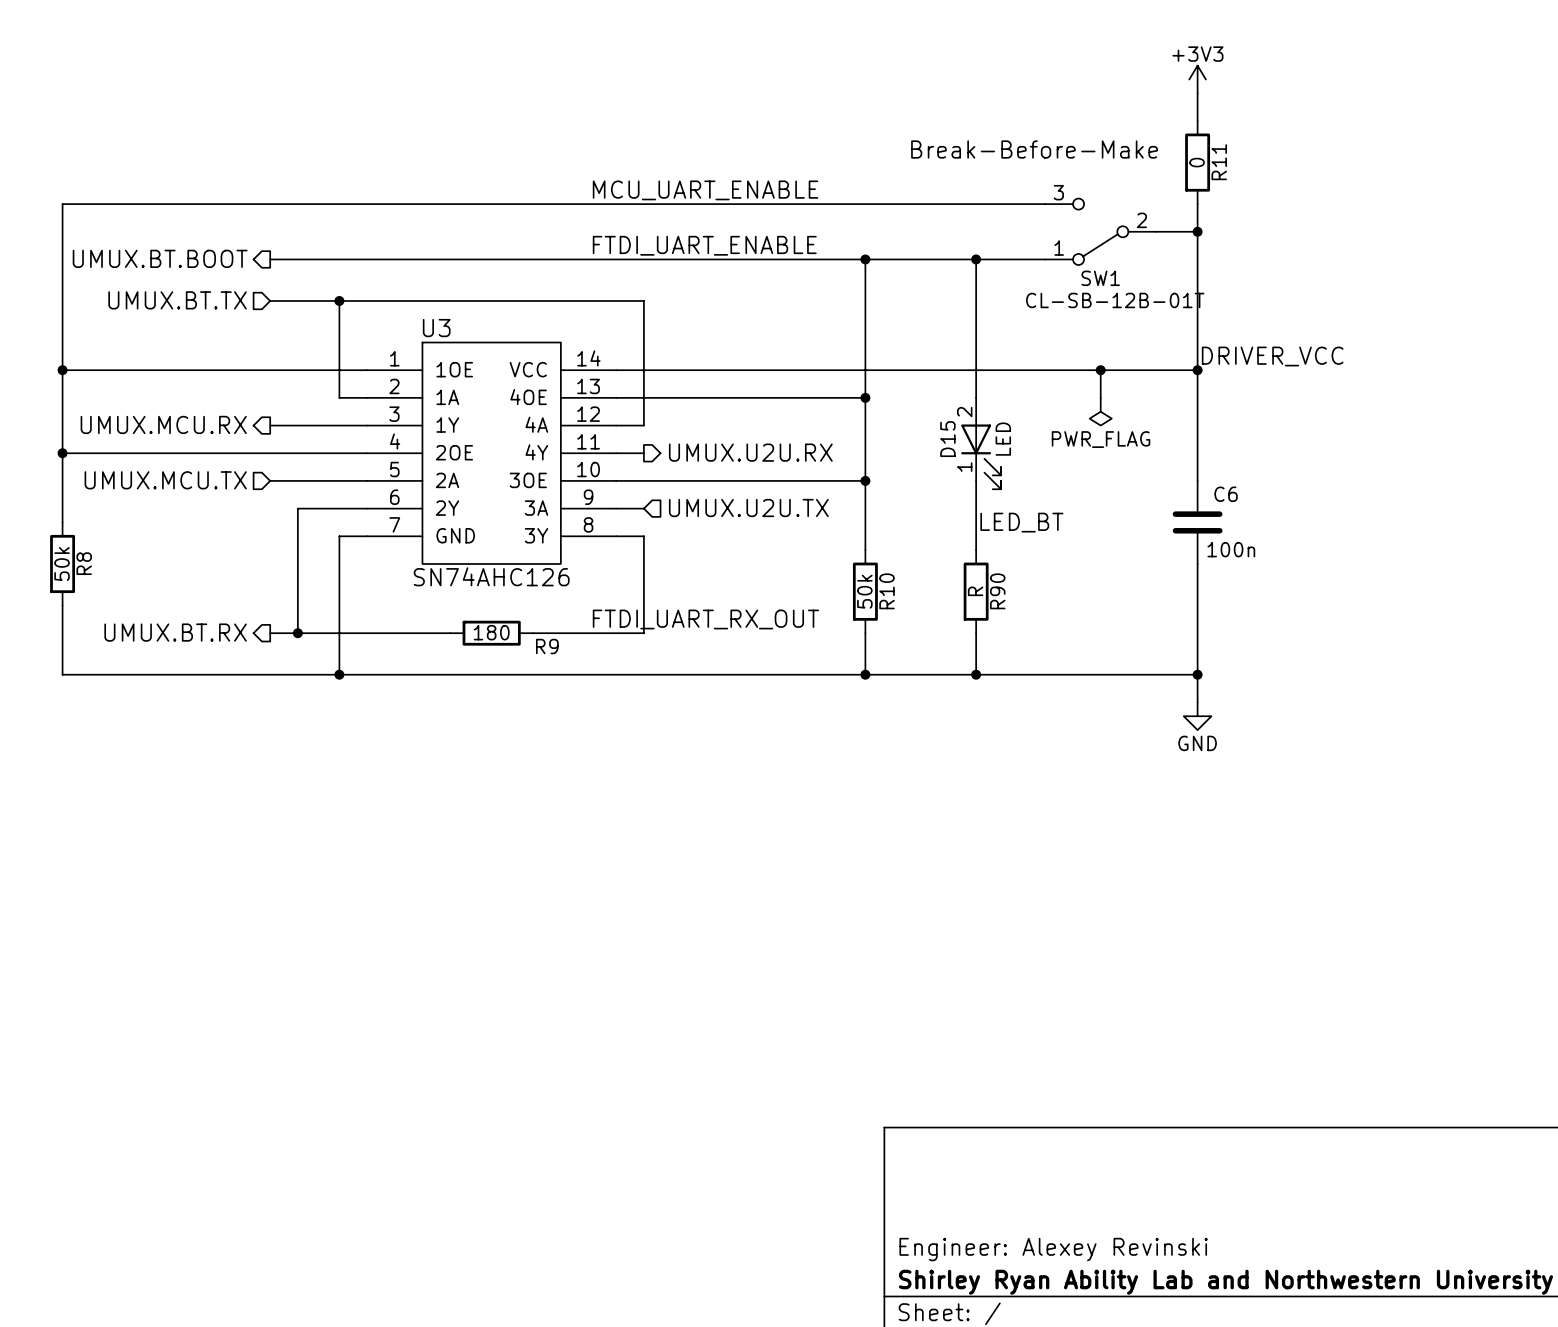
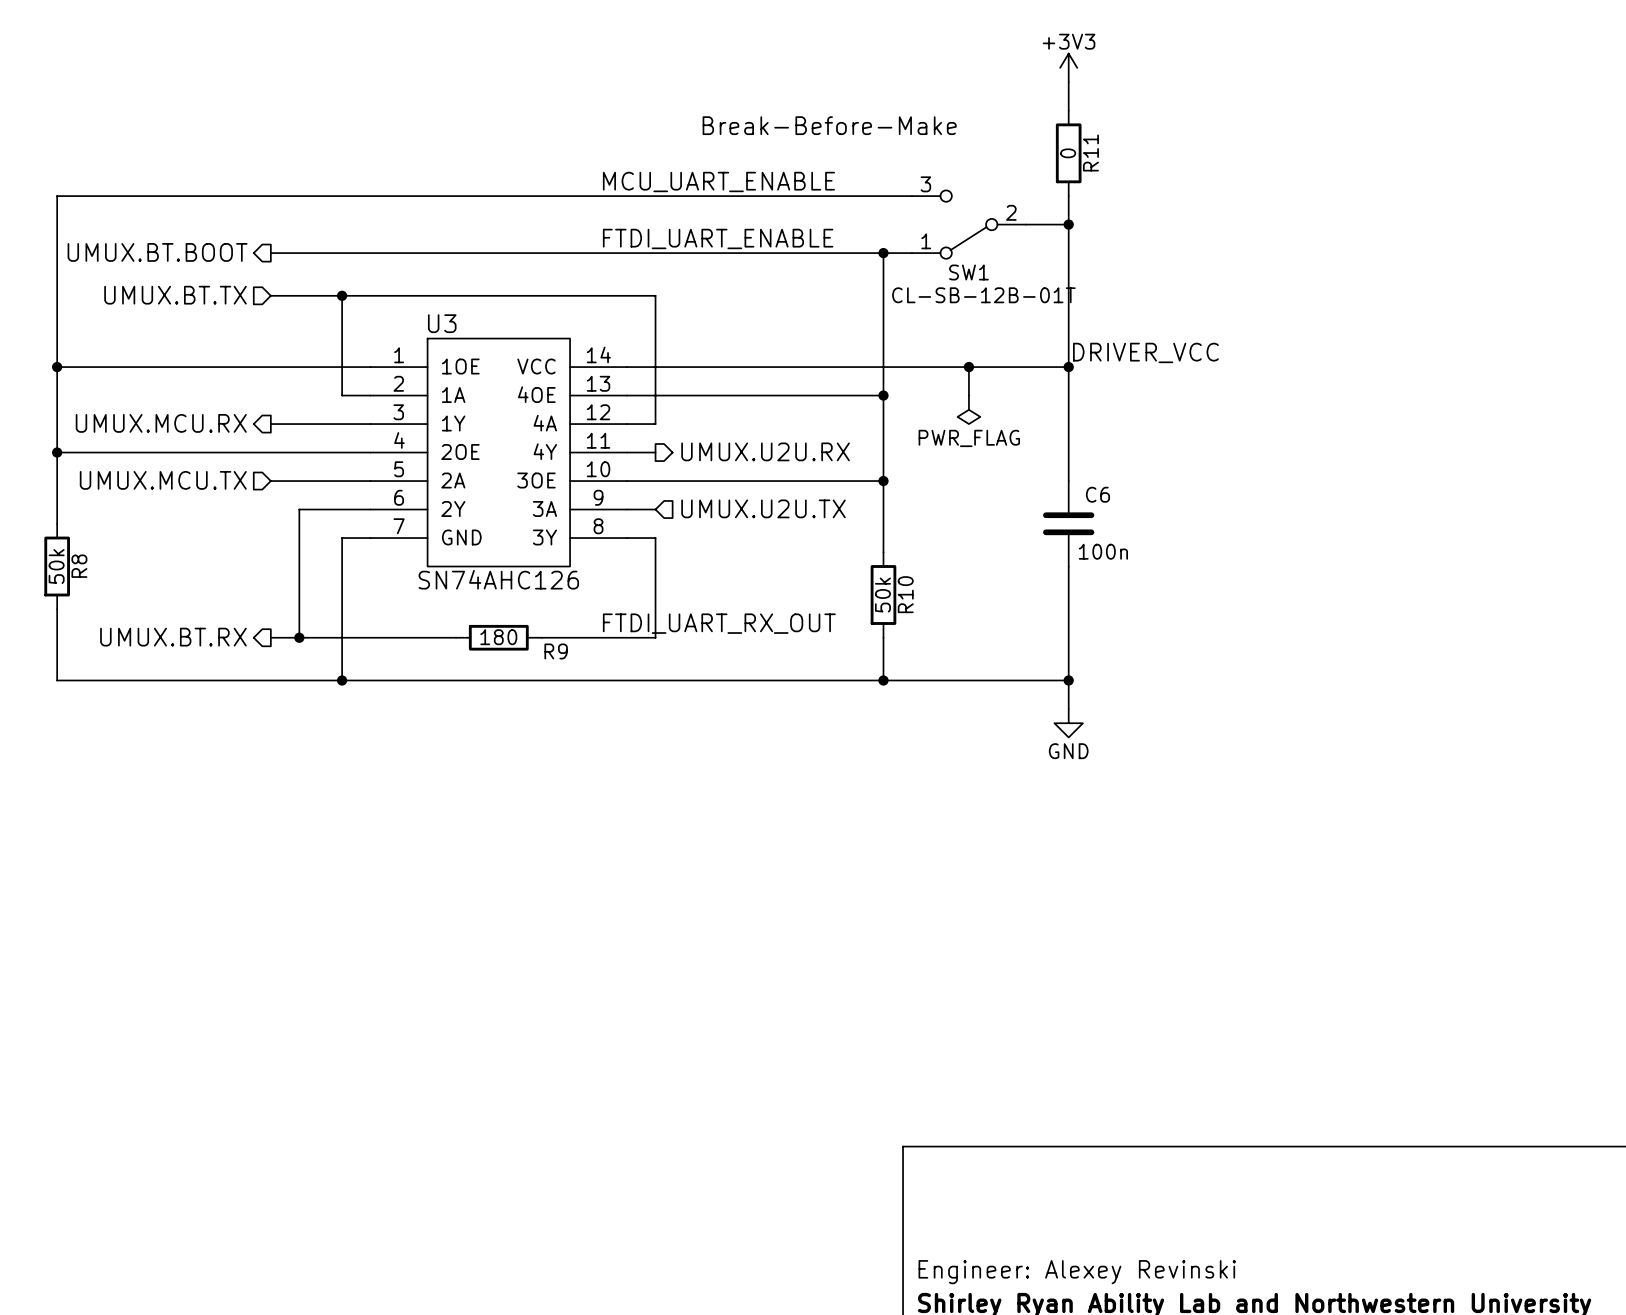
power symbol position: +3V3 (1197, 79) -> +3V3 (1068, 67)
wire: (1197, 93) (1197, 121) -> (1068, 82) (1068, 110)
text position: Break-Before-Make (1034, 149) -> Break-Before-Make (829, 125)
R11 position: (1197, 162) -> (1068, 153)
wire: (893, 204) (1045, 204) -> (1068, 481) (1068, 196)
wire: (1197, 204) (1197, 480) -> none
junction: none -> (1068, 224)
SW1 position: (1100, 231) -> (968, 224)
wire: (1156, 231) (1197, 231) -> (1025, 224) (1068, 224)
junction: (1197, 231) -> none
wire: (893, 259) (1045, 259) -> none
wire: (976, 259) (976, 397) -> none
junction: (976, 259) -> none
label position: DRIVER_VCC (1272, 356) -> DRIVER_VCC (1145, 352)
junction: none -> (968, 367)
wire: (1045, 370) (1197, 370) -> none
wire: (1100, 370) (1100, 397) -> (968, 367) (968, 395)
junction position: (1100, 370) -> (1068, 367)
junction: (1197, 370) -> none
power symbol position: PWR_FLAG (1100, 411) -> PWR_FLAG (968, 409)
D15: LED (981, 443) -> none
wire: (976, 480) (976, 550) -> none
label: LED_BT (1021, 522) -> none
C6 position: (1197, 522) -> (1068, 523)
wire: (1197, 563) (1197, 702) -> (1068, 566) (1068, 708)
R90: R (976, 591) -> none
wire: (976, 633) (976, 674) -> none
junction: (976, 674) -> none
wire: (1045, 674) (1197, 674) -> none
junction: none -> (1068, 680)
junction: (1197, 674) -> none
power symbol position: GND (1197, 716) -> GND (1068, 723)

